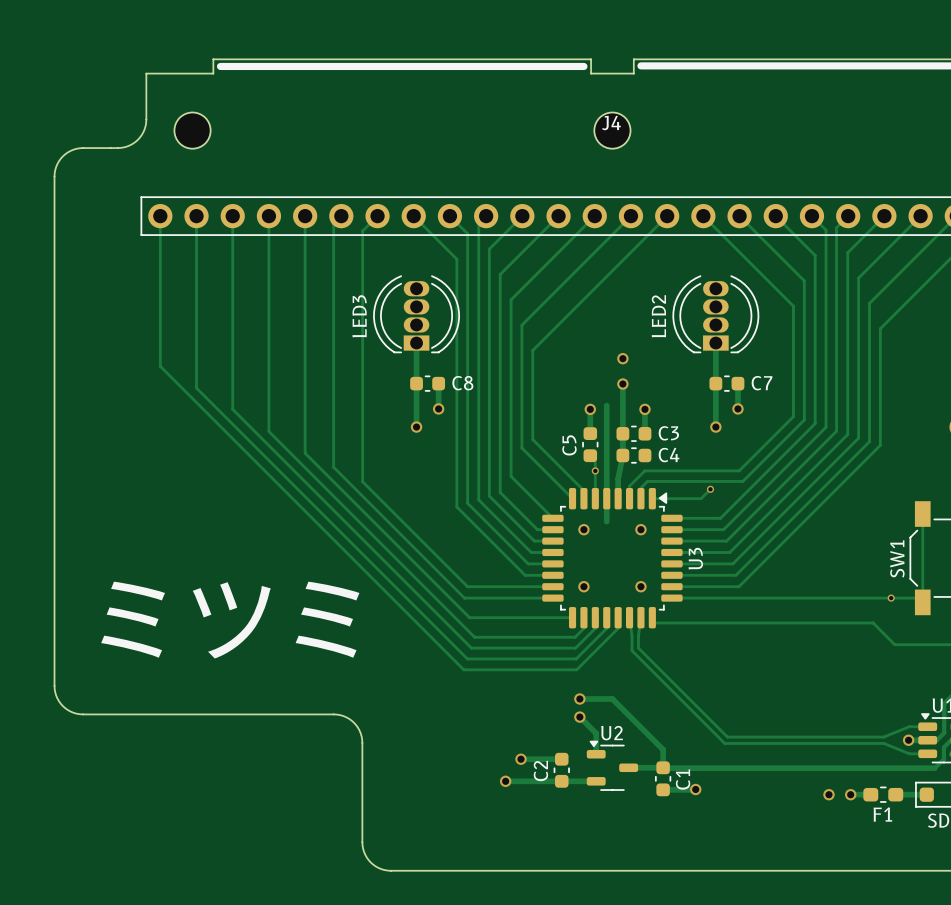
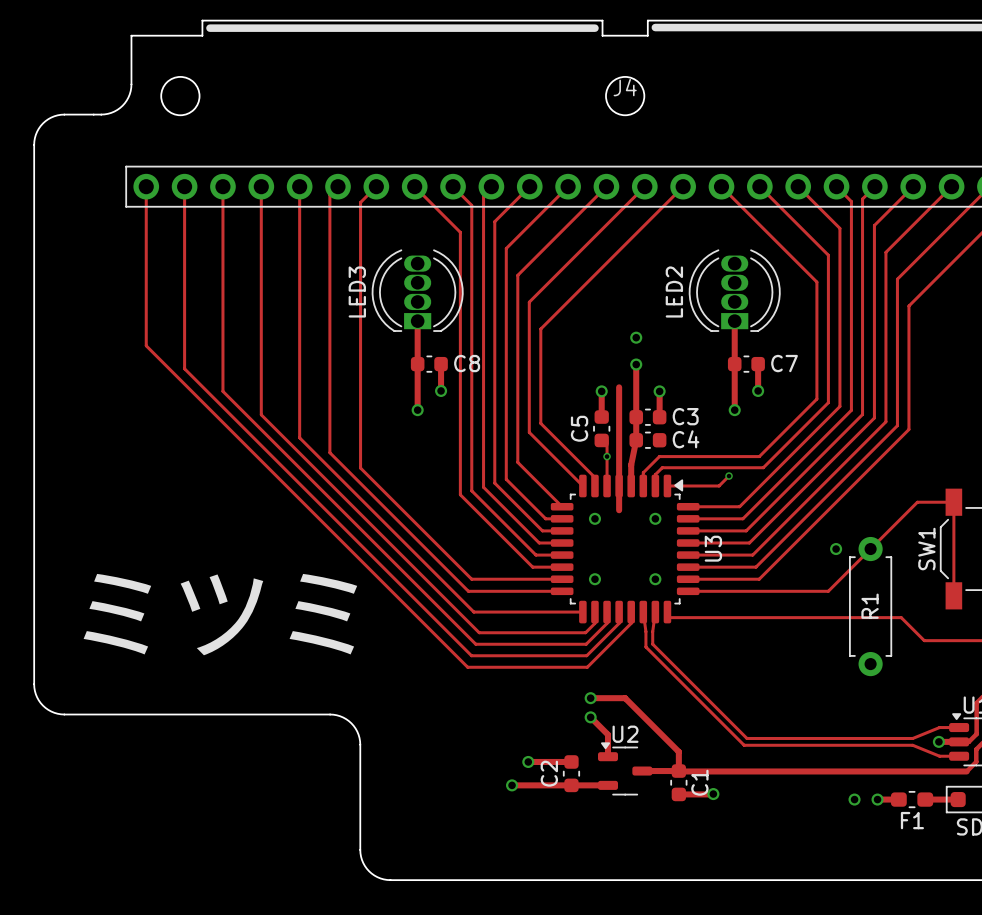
via: none -> (836, 549)
track: (804, 598) (918, 598) (922, 602) -> (828, 591) (917, 502) (953, 502)
via: (891, 598) -> none
R1: none -> (870, 606)

